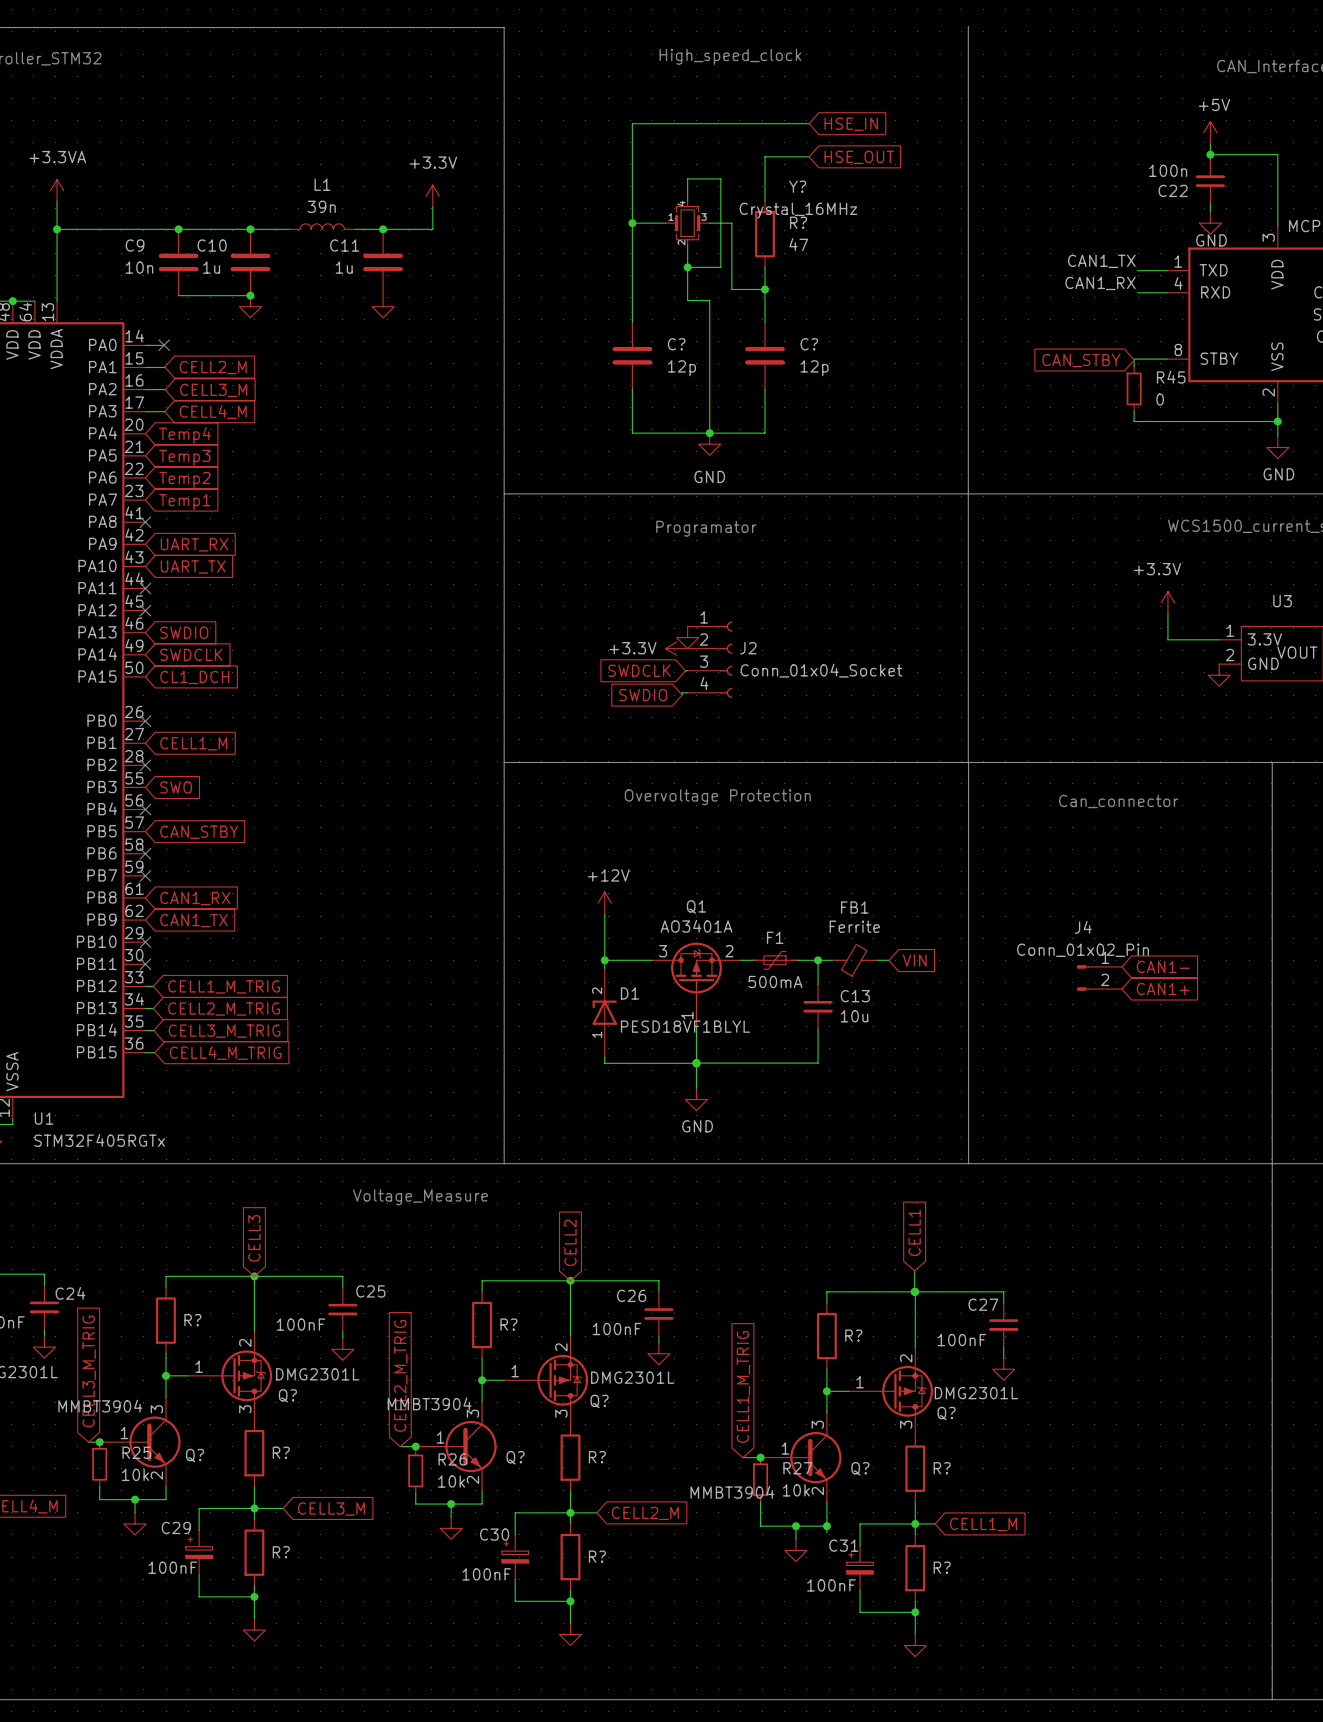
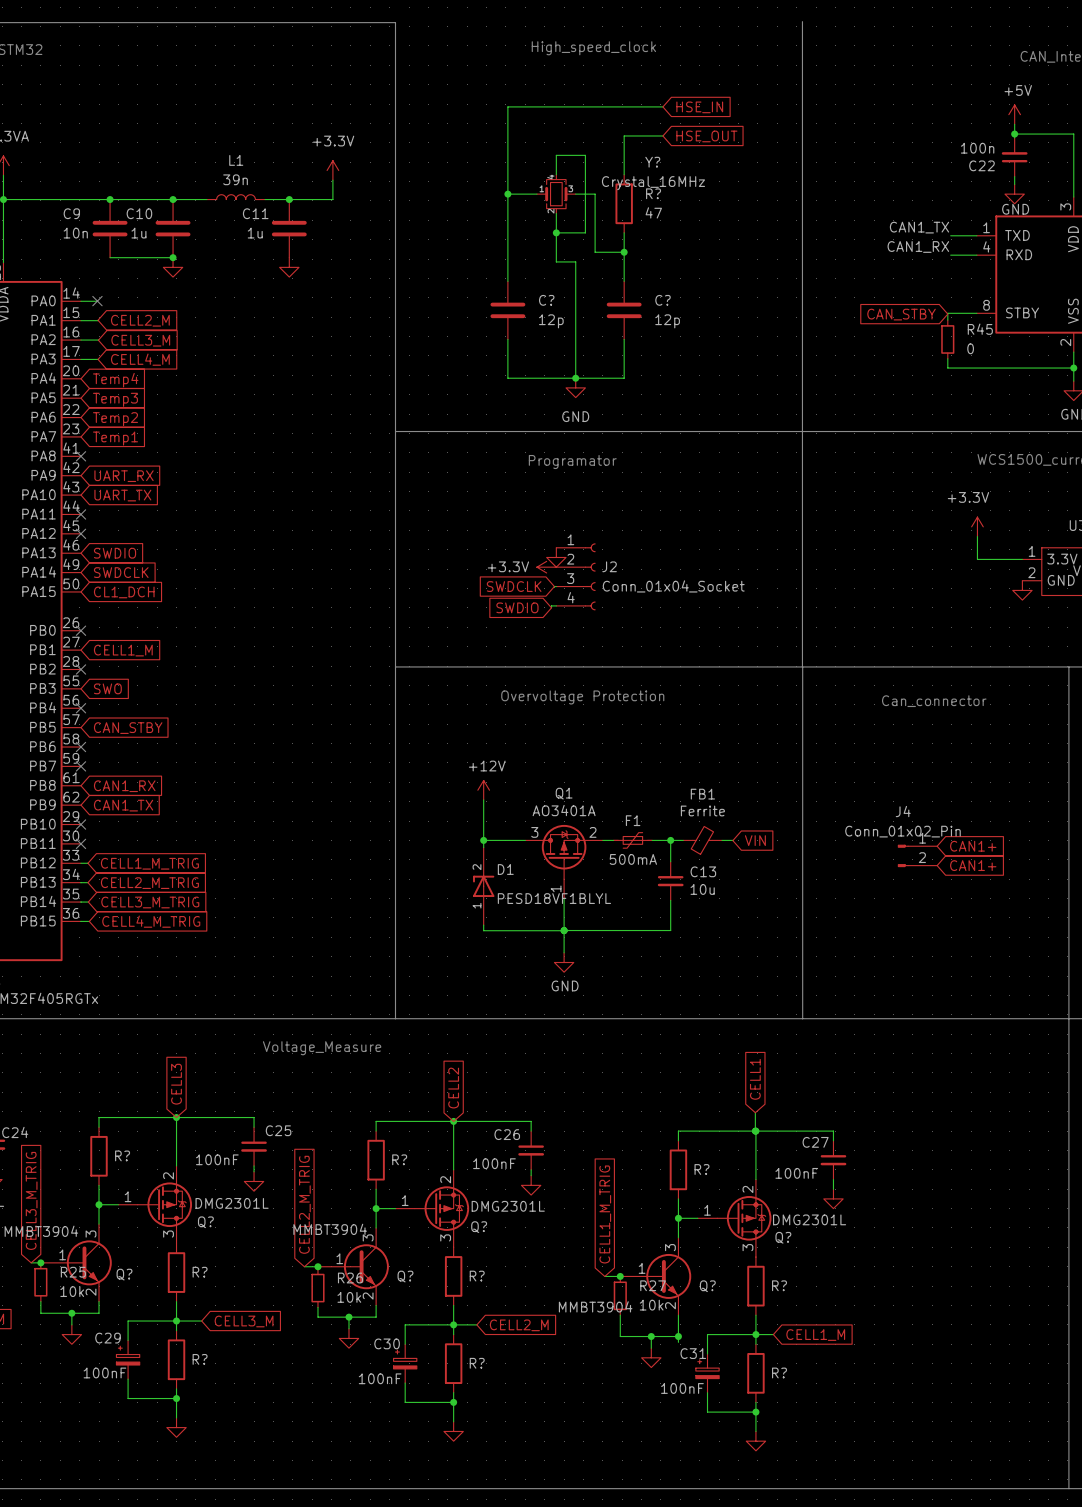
global label: CAN1- (1163, 966) -> CAN1+ (973, 846)

